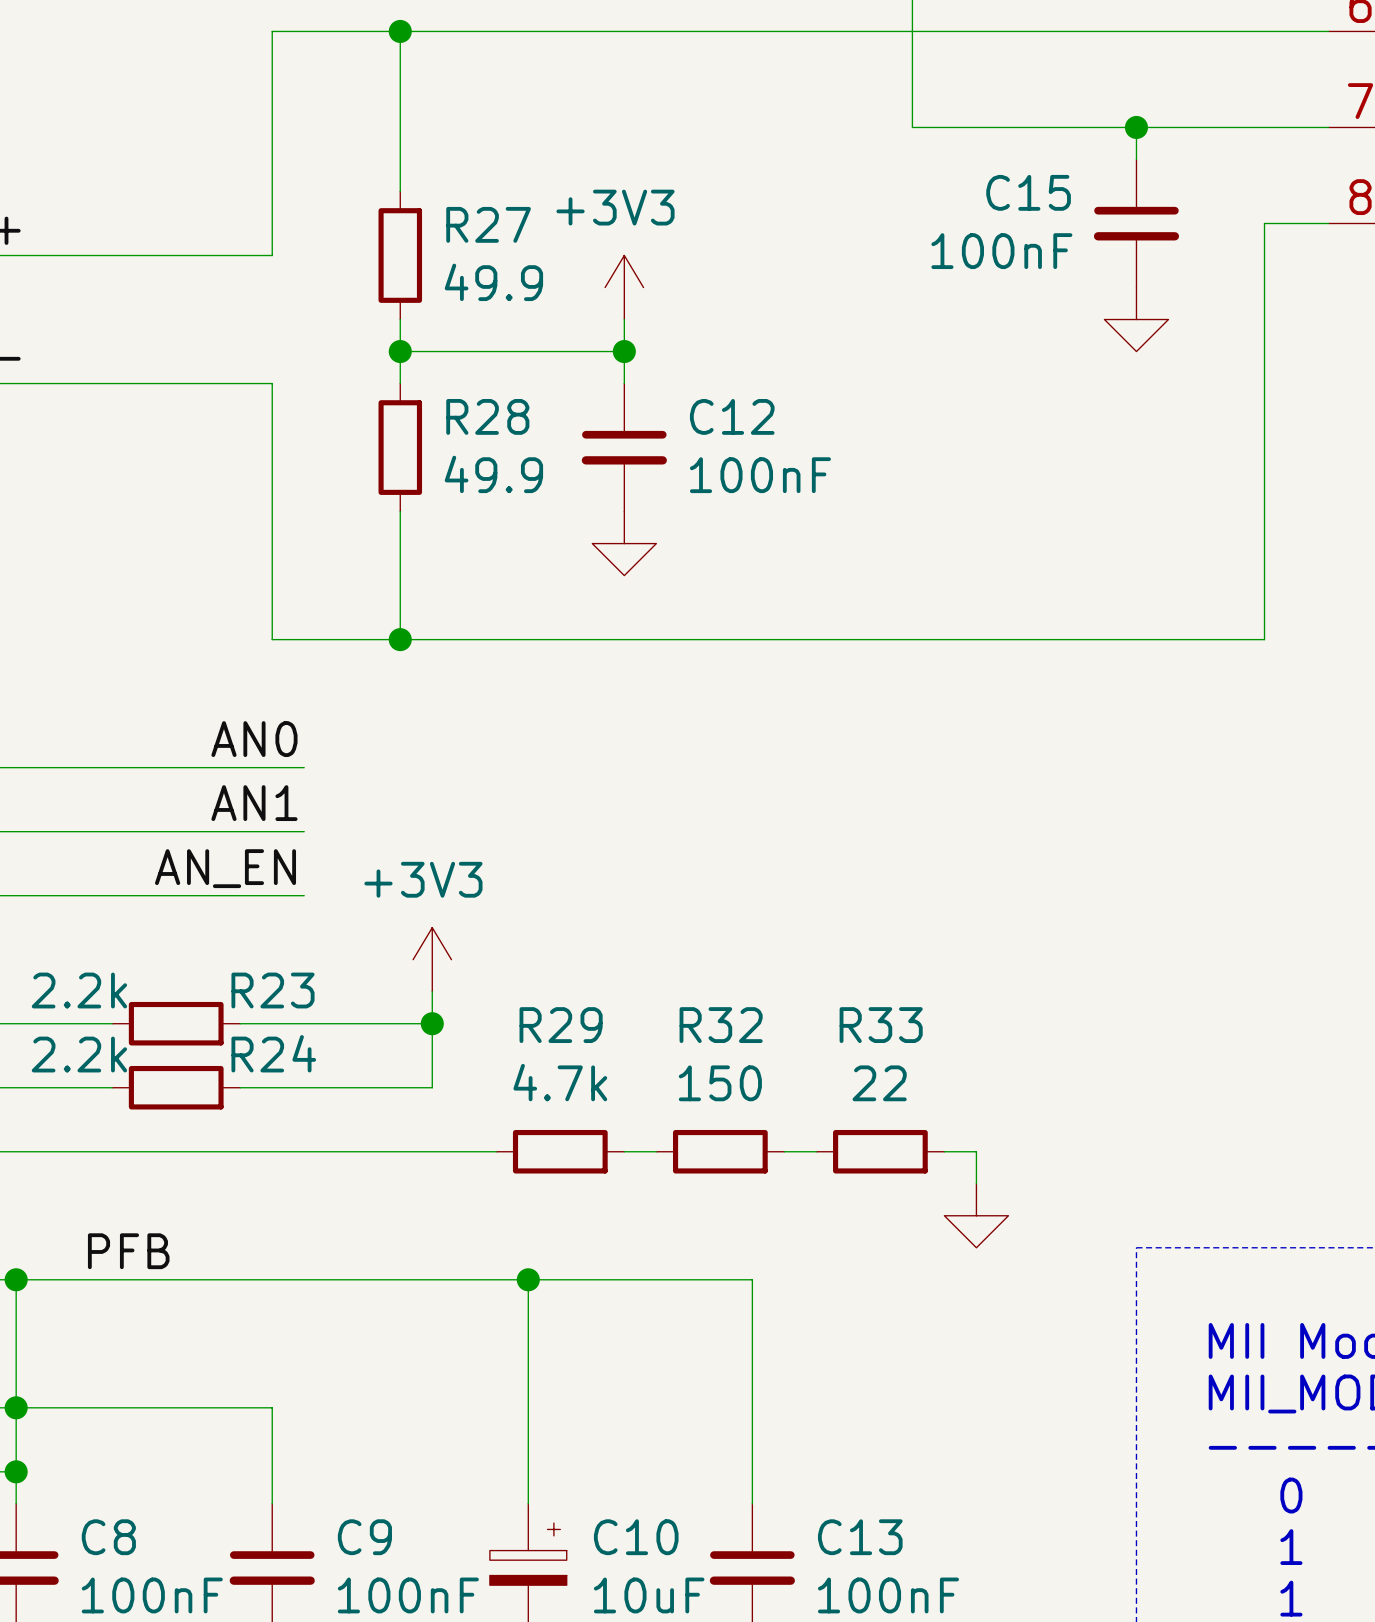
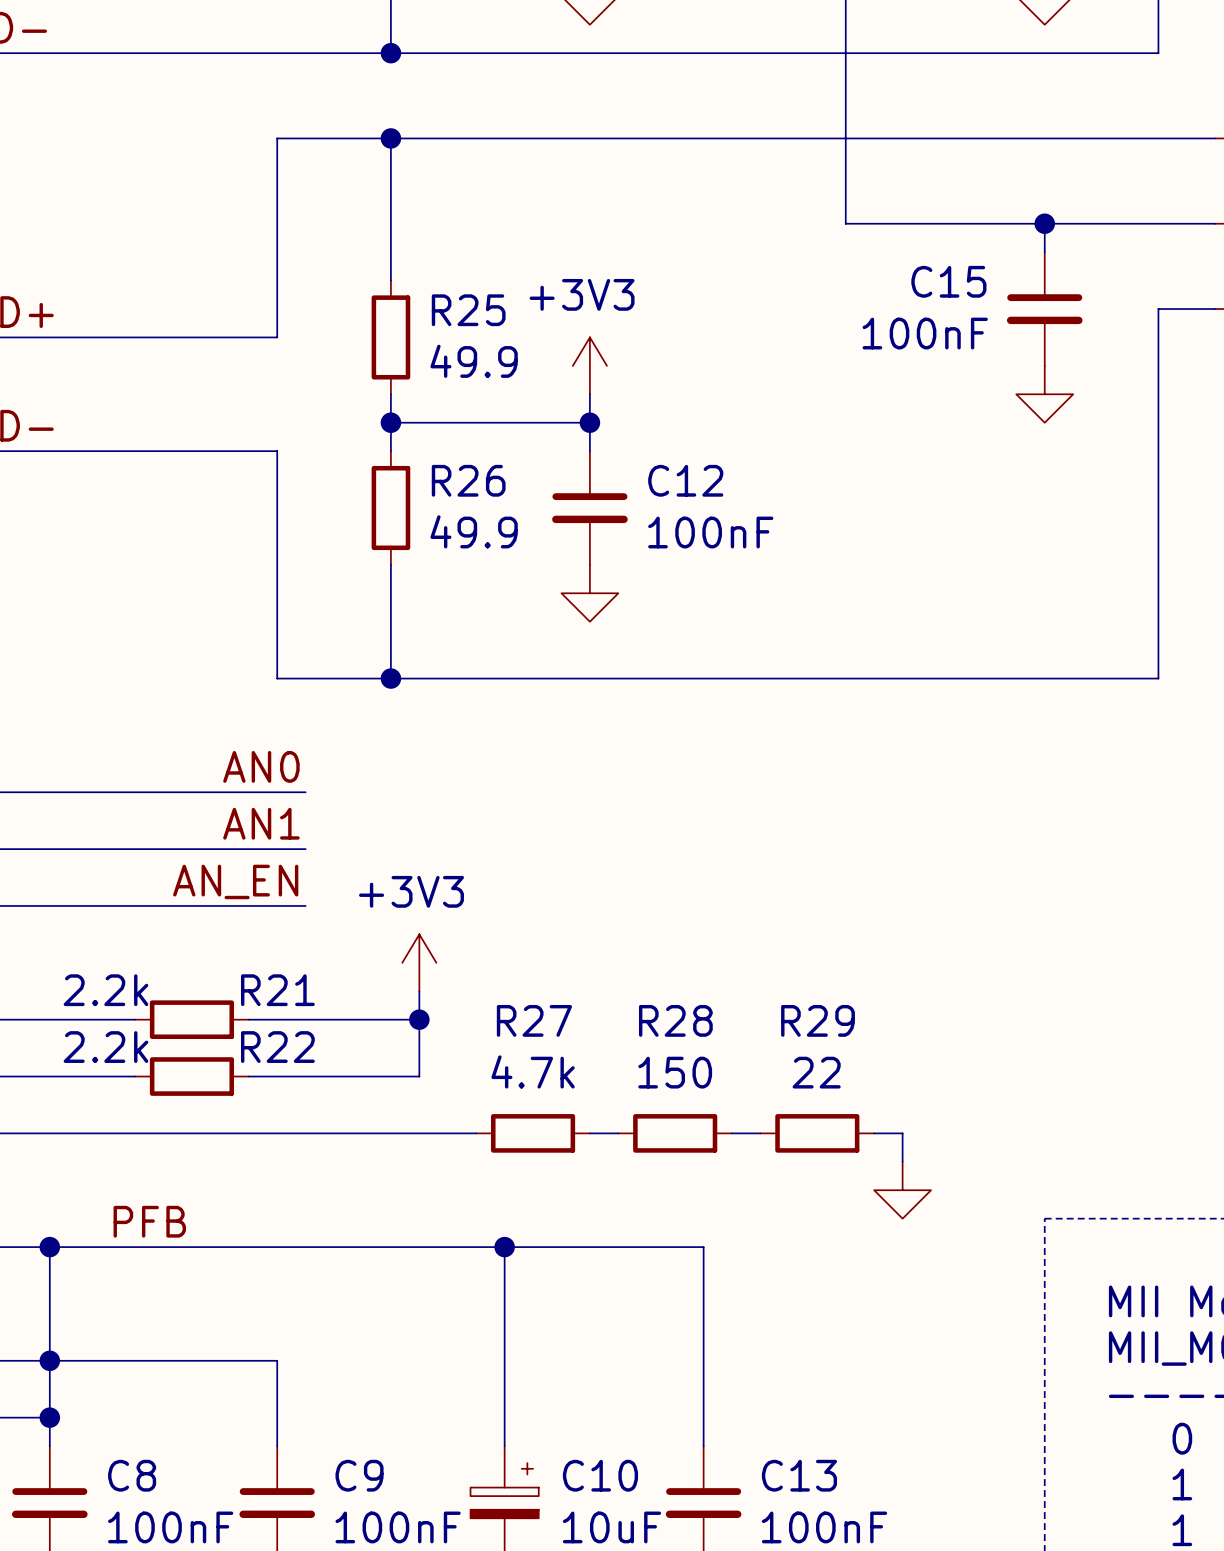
R27 name: R27 (488, 224) -> R25 (468, 310)
R28 name: R28 (487, 416) -> R26 (468, 480)
R23 name: R23 (273, 990) -> R21 (277, 990)
R29 name: R29 (561, 1025) -> R27 (534, 1020)
R32 name: R32 (721, 1025) -> R28 (675, 1020)
R33 name: R33 (881, 1025) -> R29 (818, 1020)
R24 name: R24 (273, 1053) -> R22 (277, 1047)

